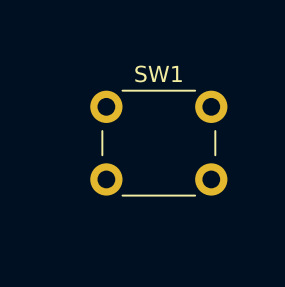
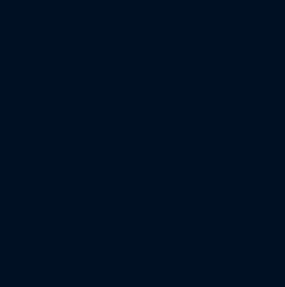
SW1: (158, 143) -> none

